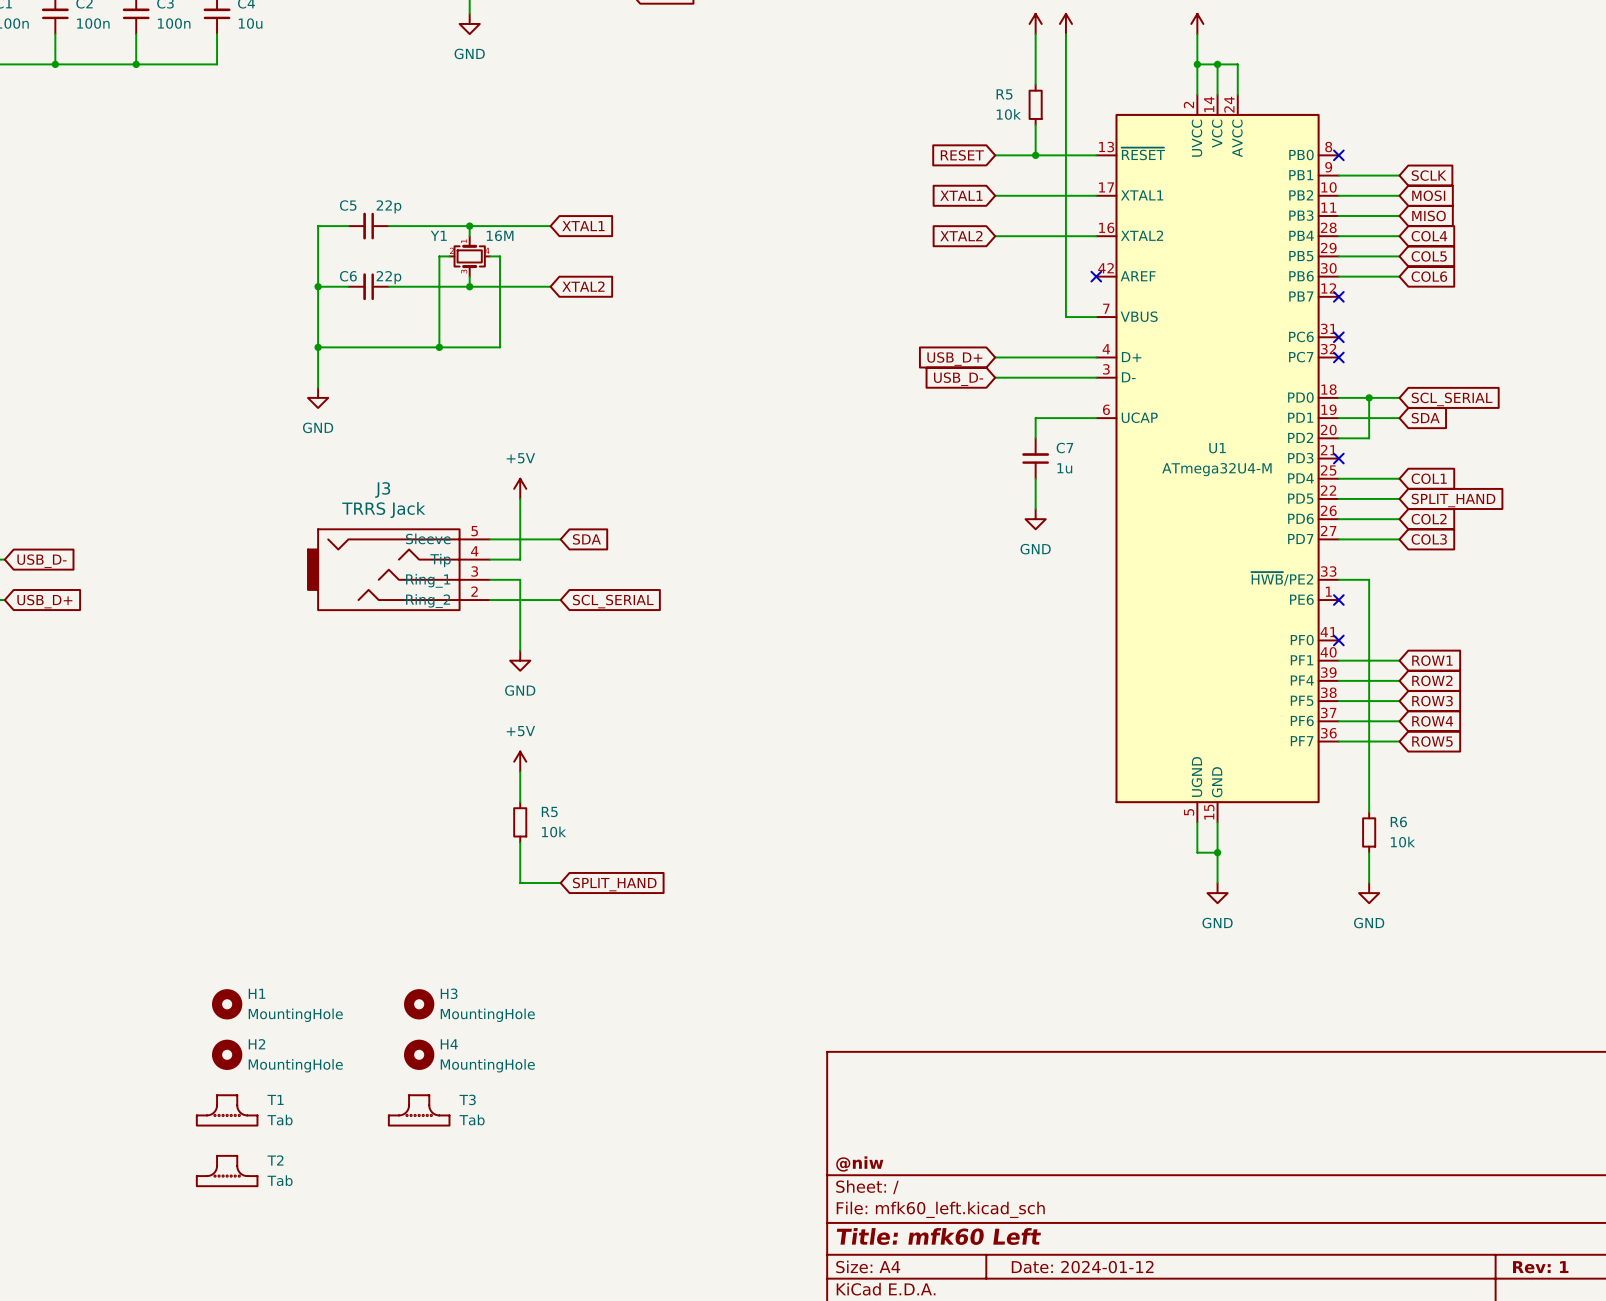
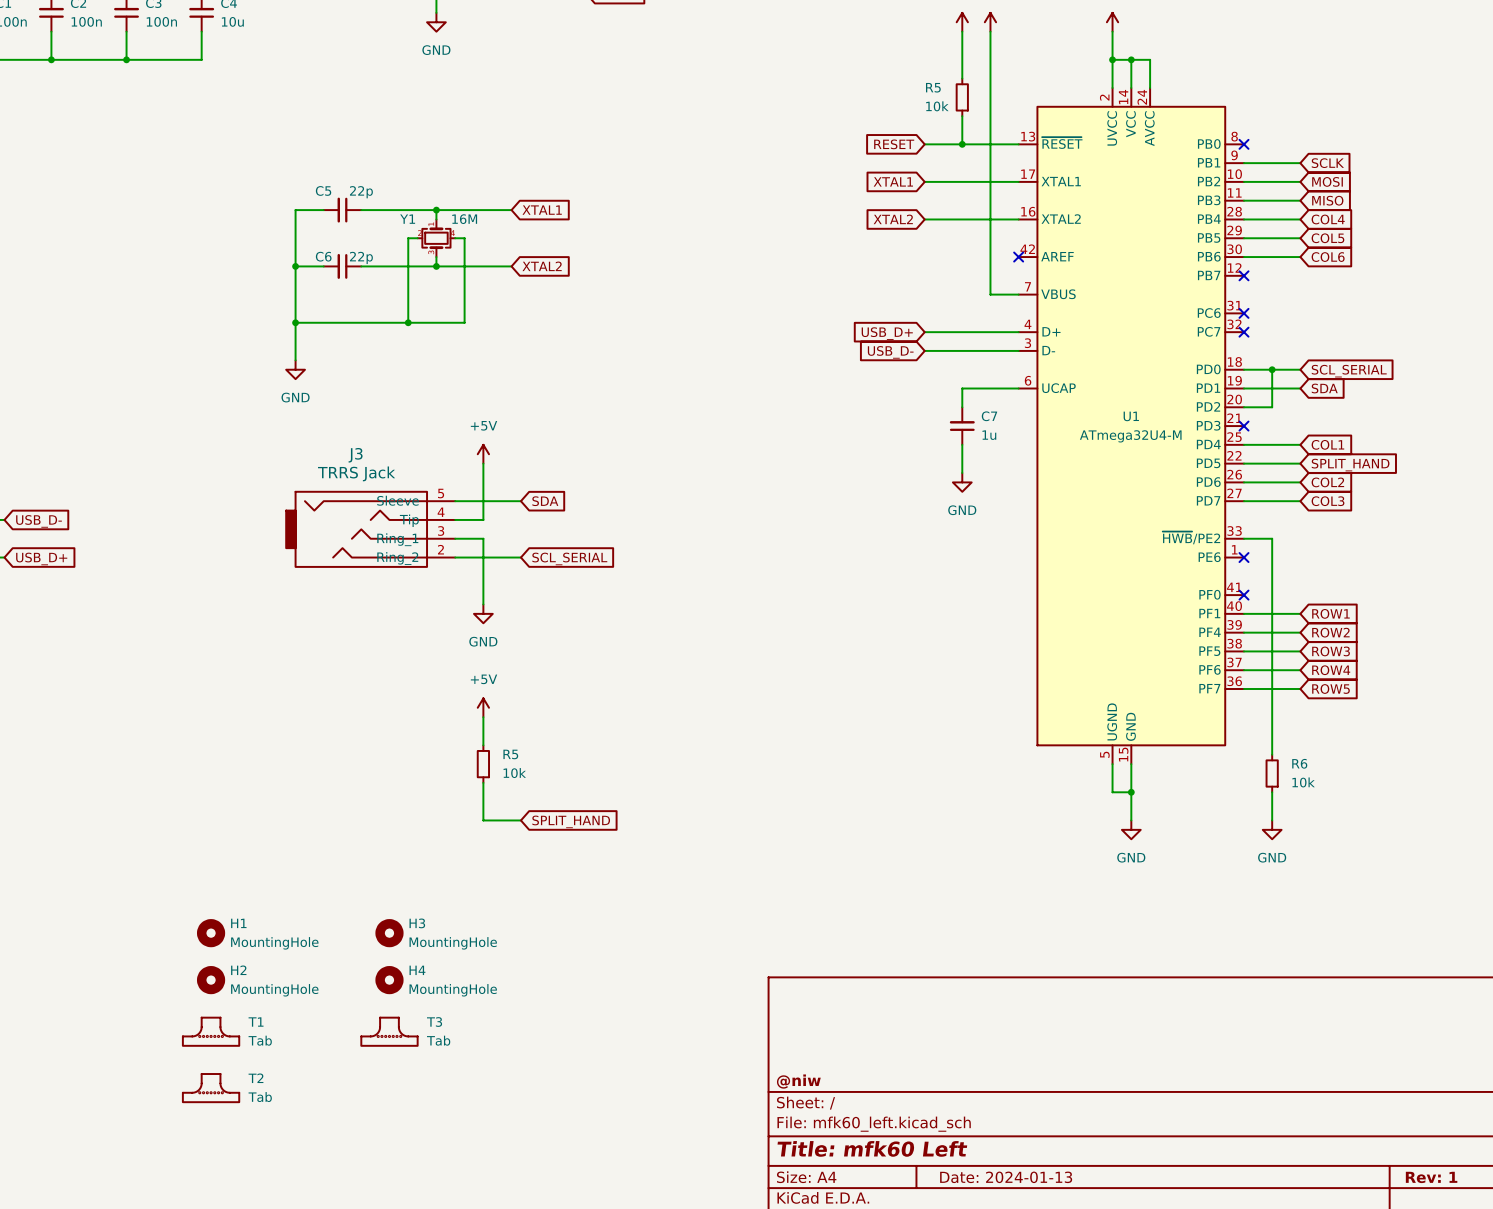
title block: Date: 2024-01-12 (1082, 1267) -> Date: 2024-01-13 (1006, 1177)

